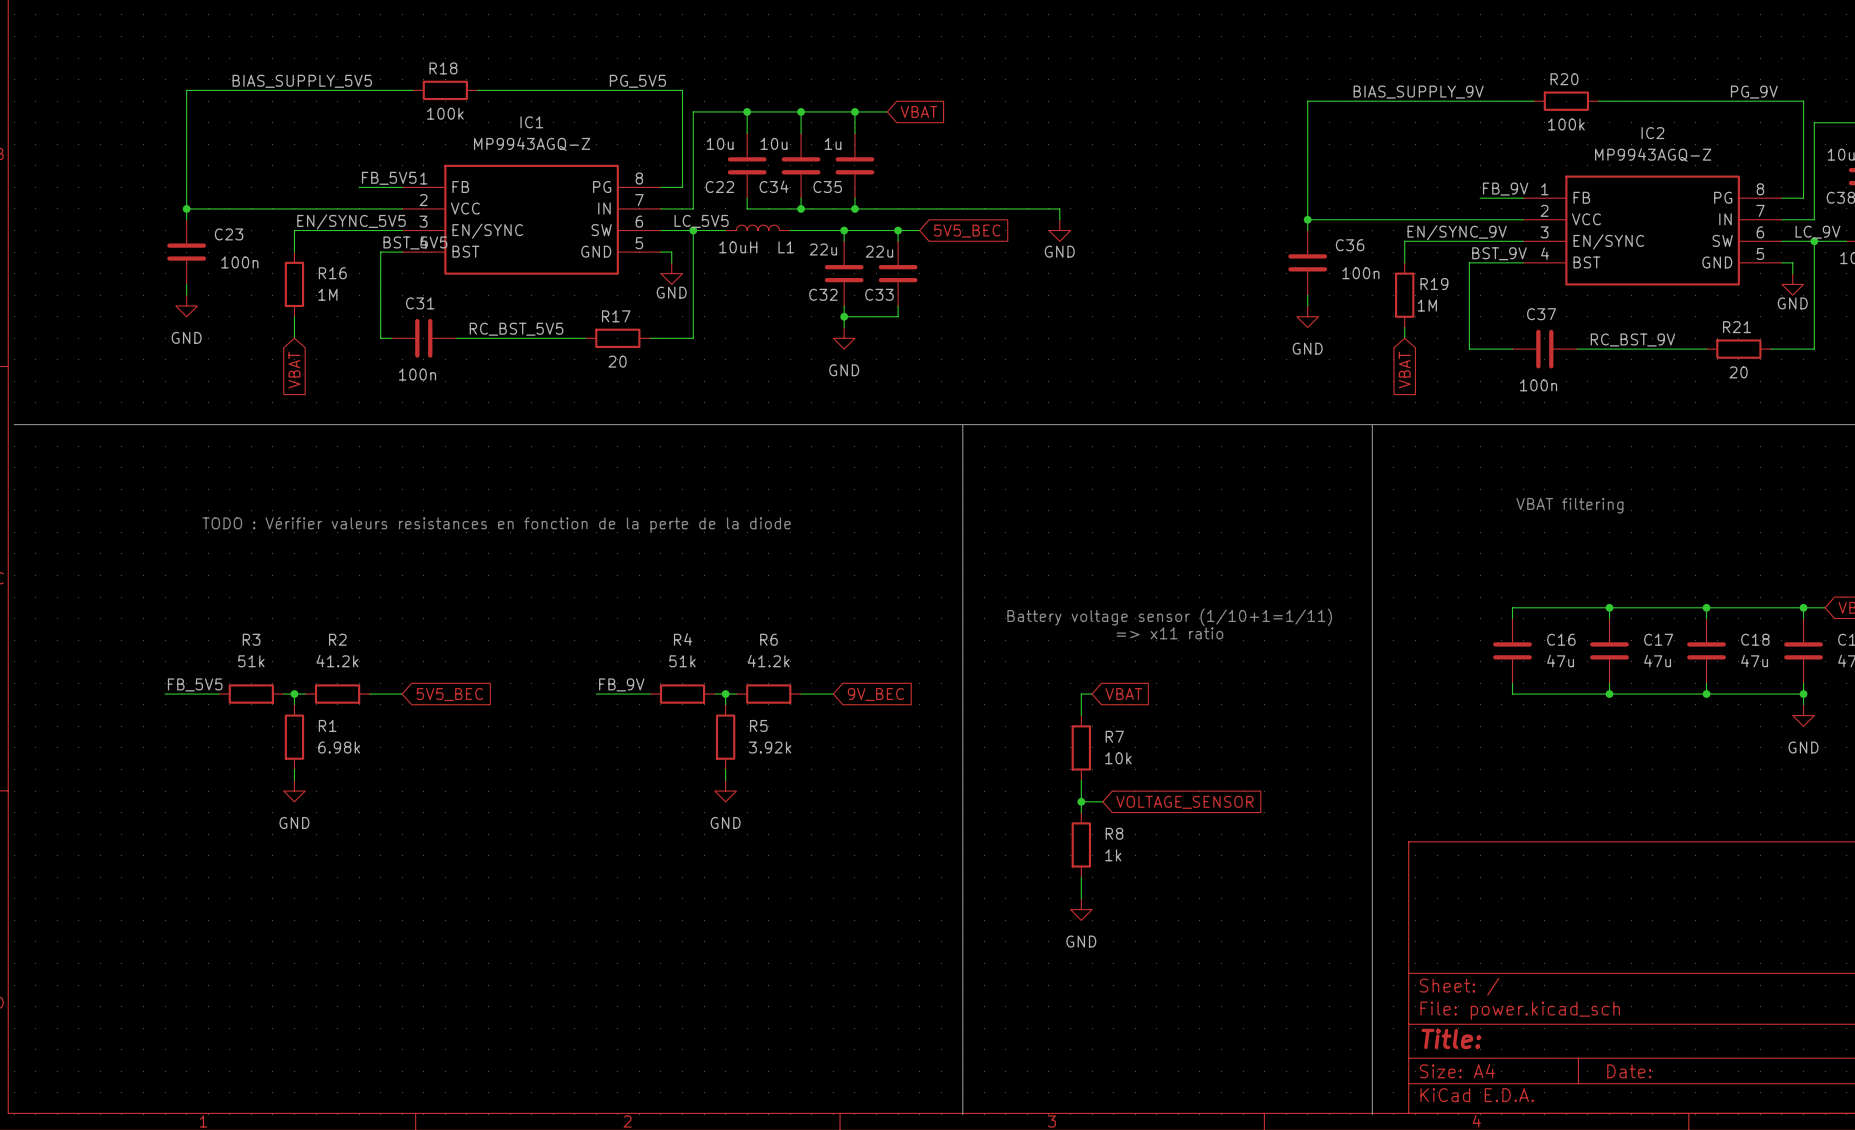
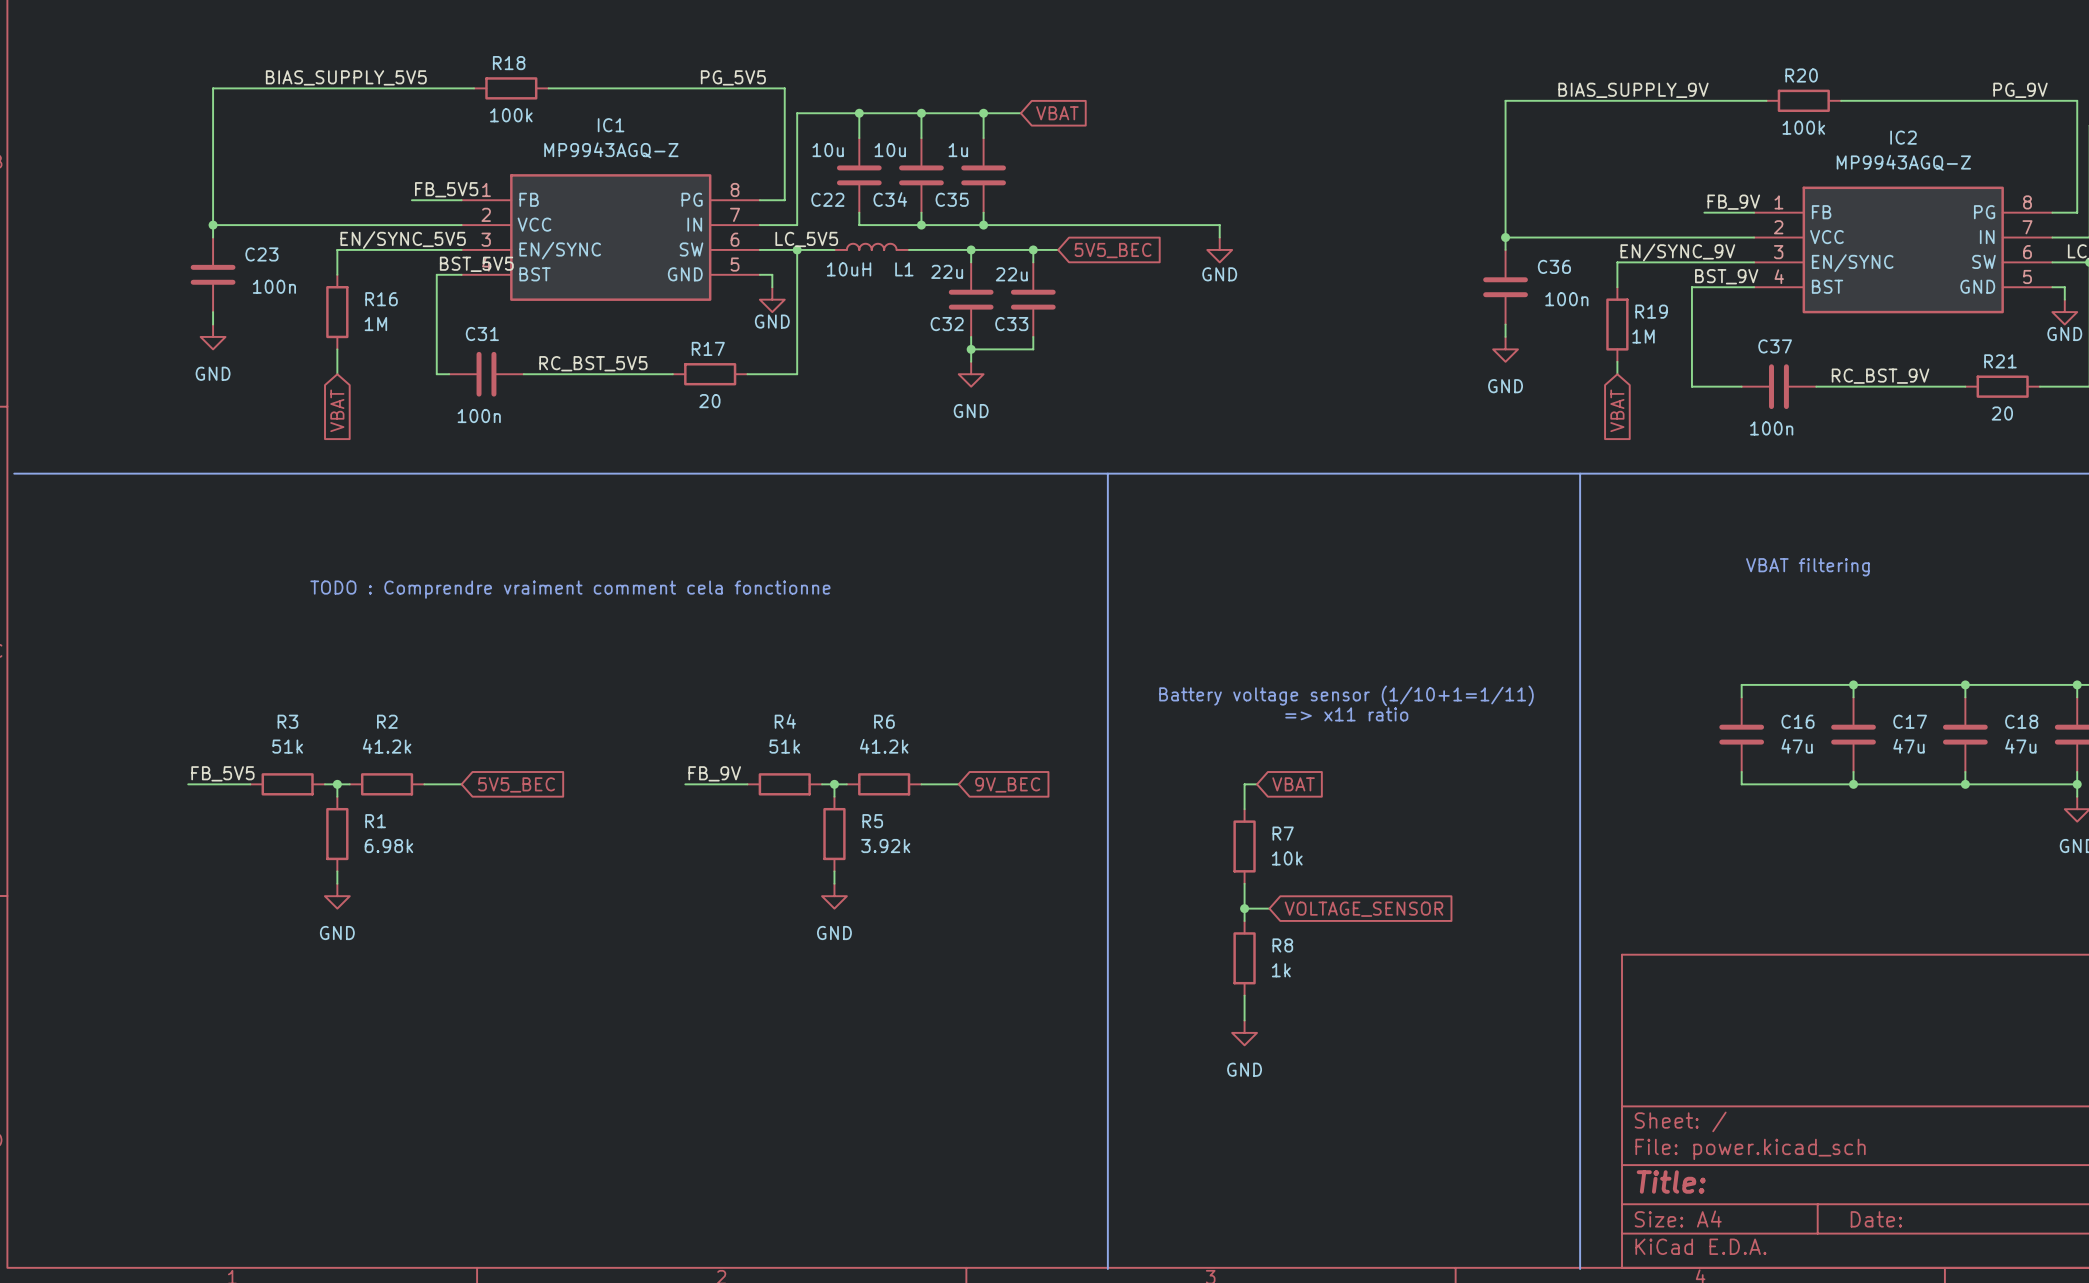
text: TODO : Vérifier valeurs resistances en fonction de la perte de la diode (496, 524) -> TODO : Comprendre vraiment comment cela fonctionne (570, 589)

